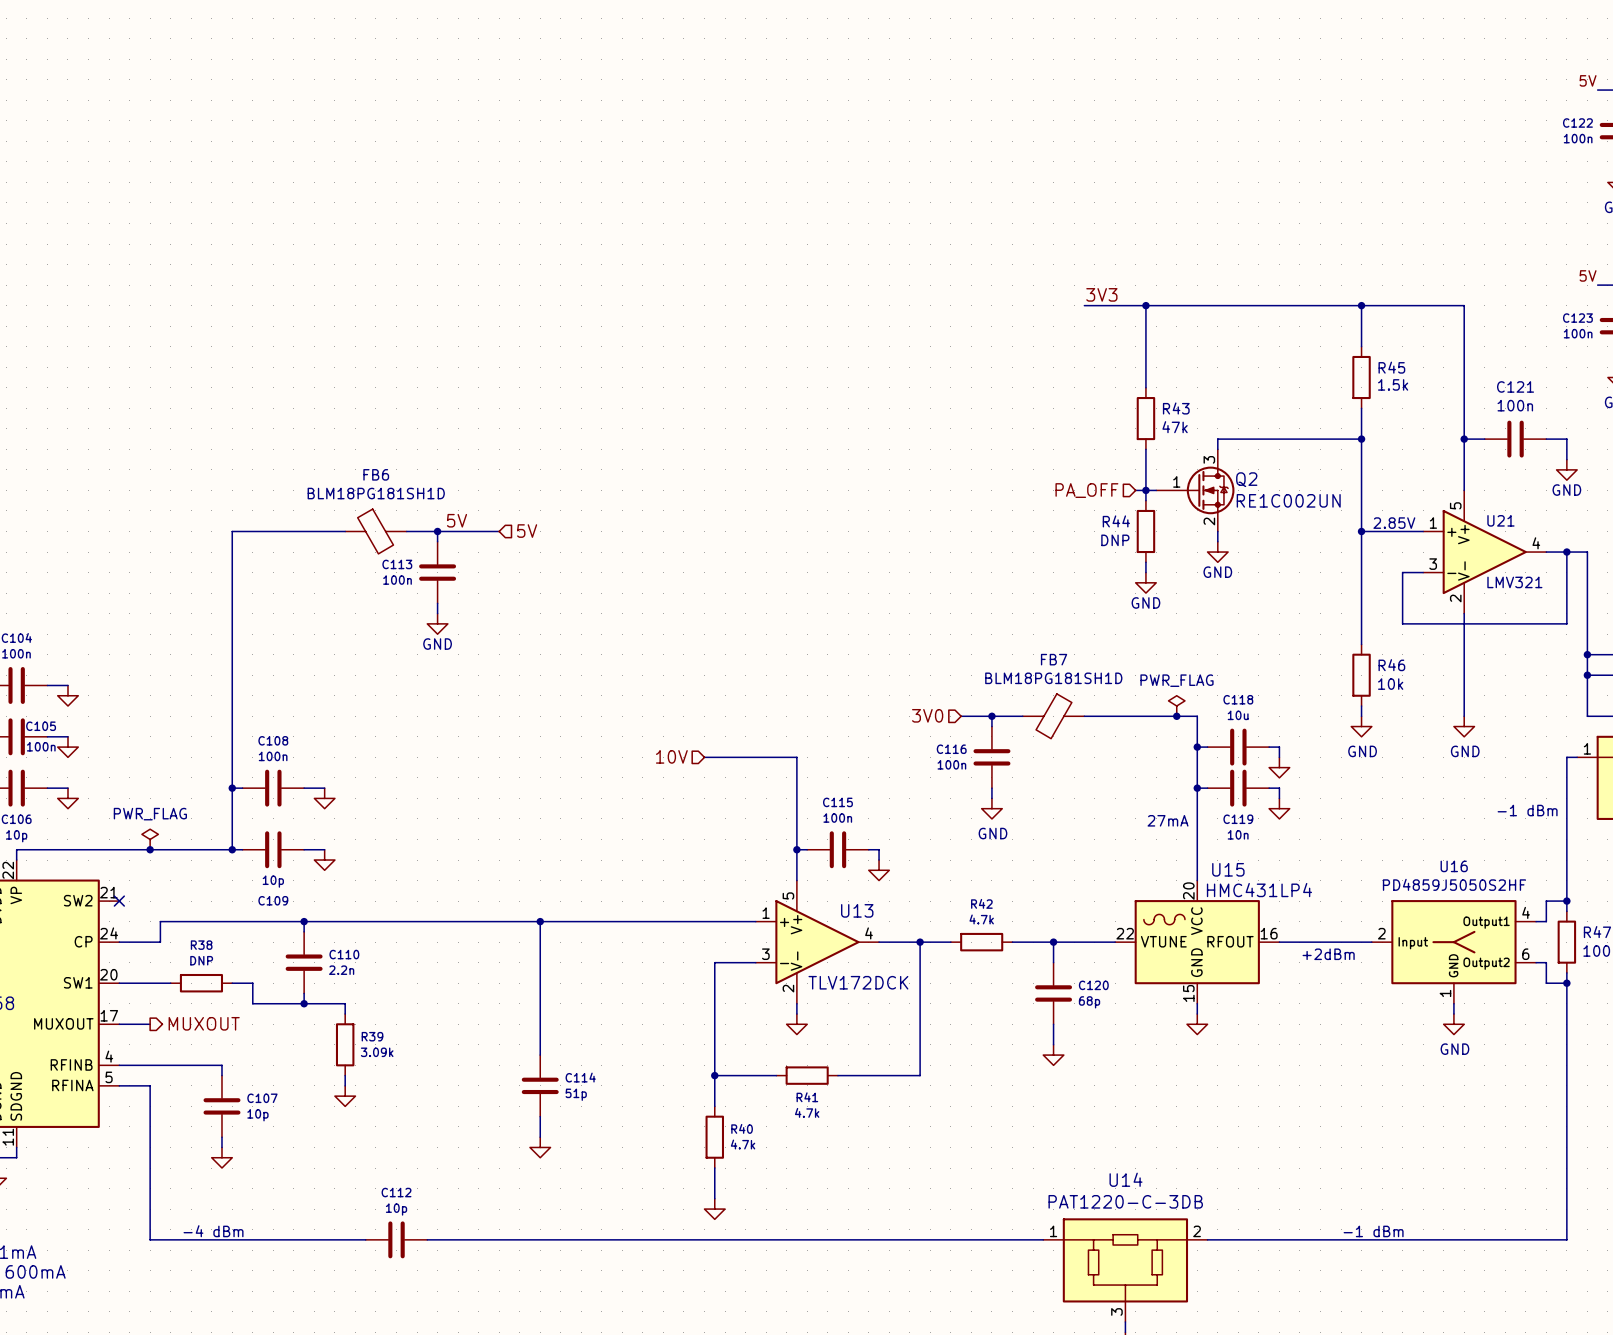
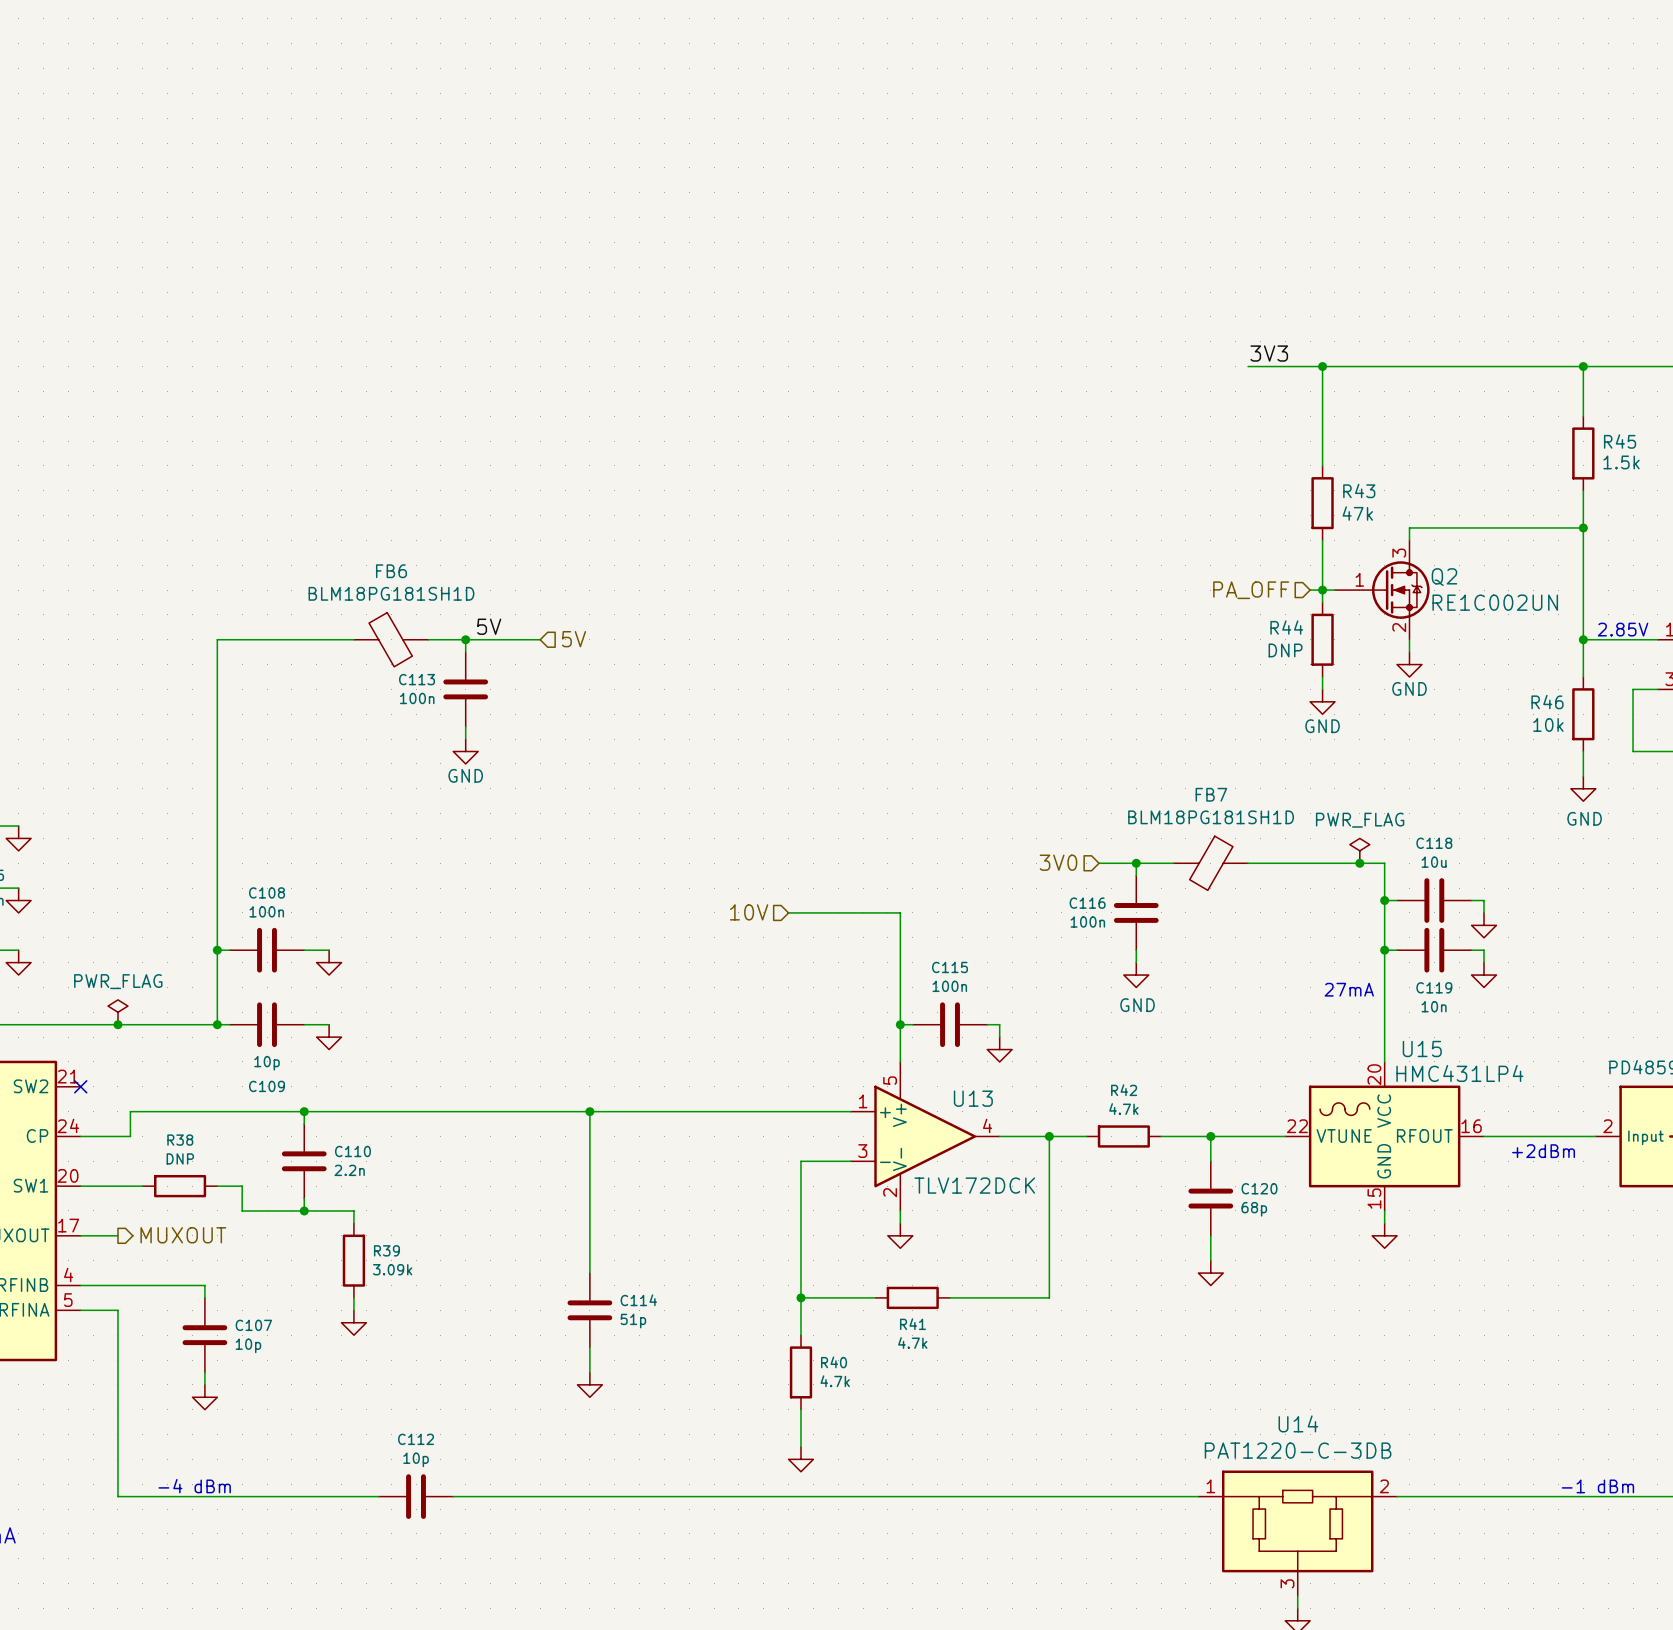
wire: (1361, 562) (1361, 623) -> none
R46 name position: R46 (1391, 665) -> R46 (1547, 702)
R46 position: (1361, 675) -> (1583, 714)
R46 value position: 10k (1390, 684) -> 10k (1548, 724)
wire: (1361, 706) (1361, 716) -> none
power symbol position: GND (1361, 726) -> GND (1583, 788)

